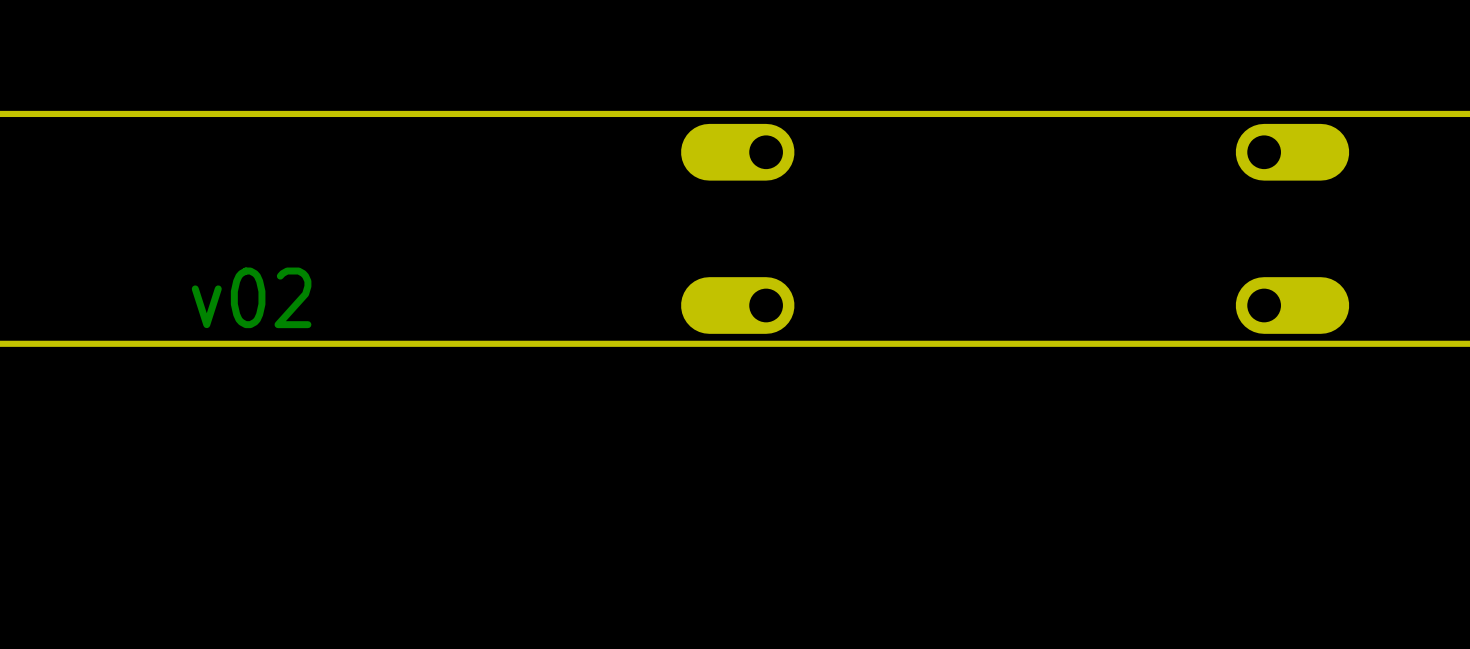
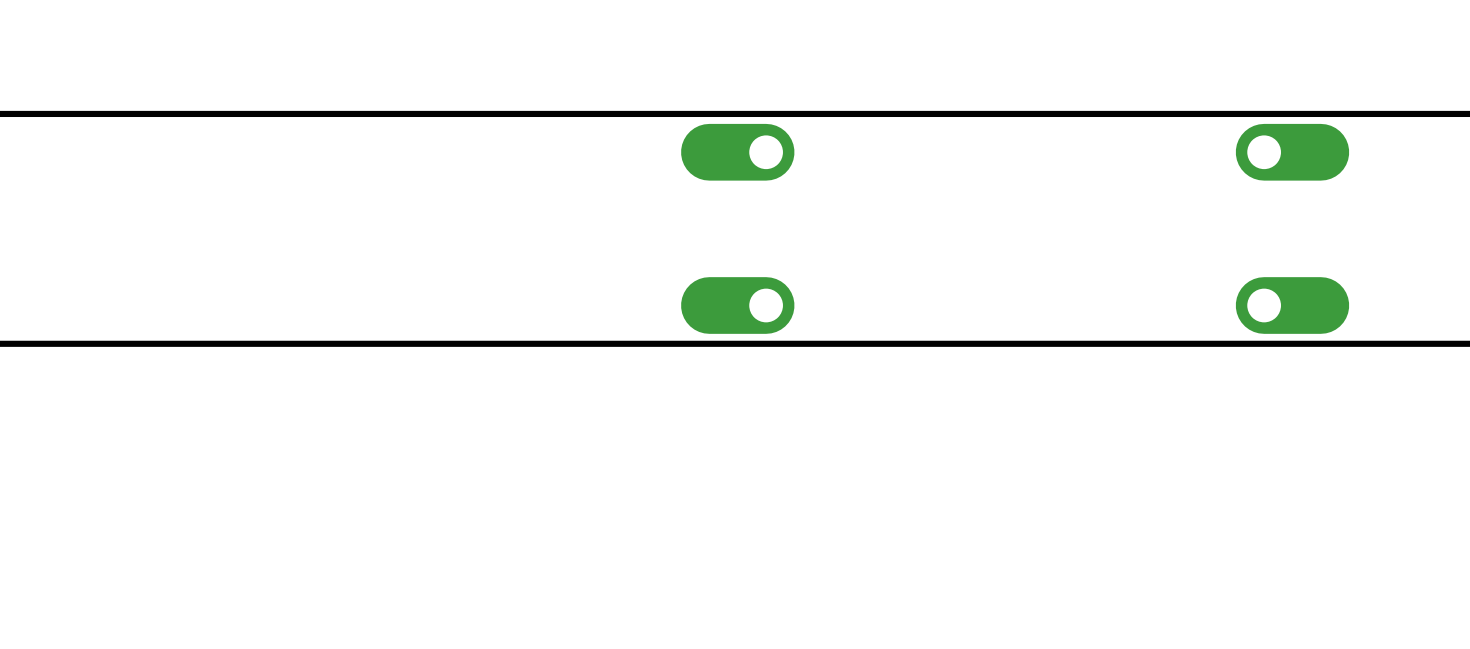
text: v02 (251, 297) -> none

